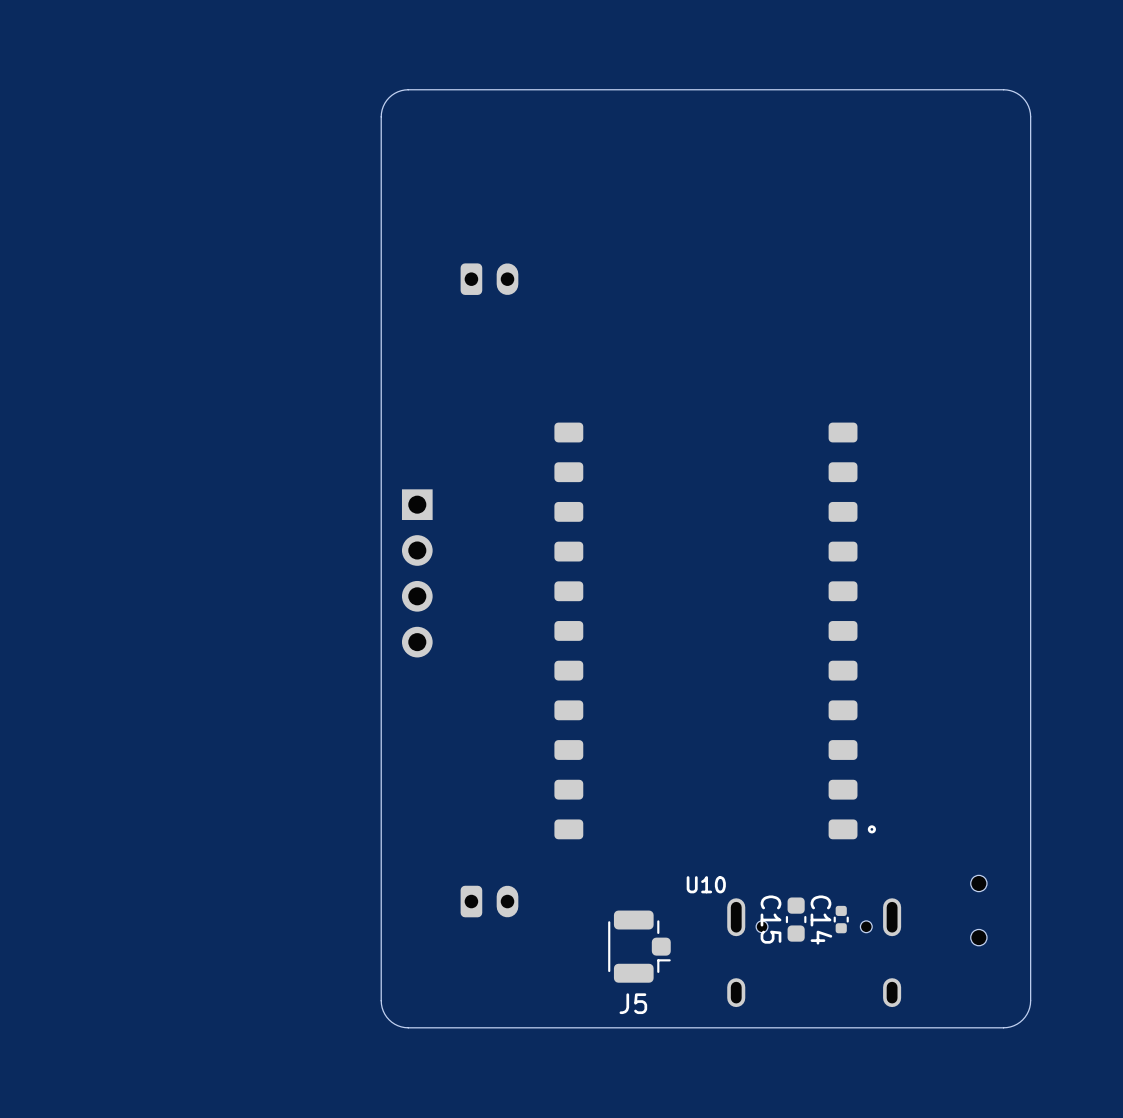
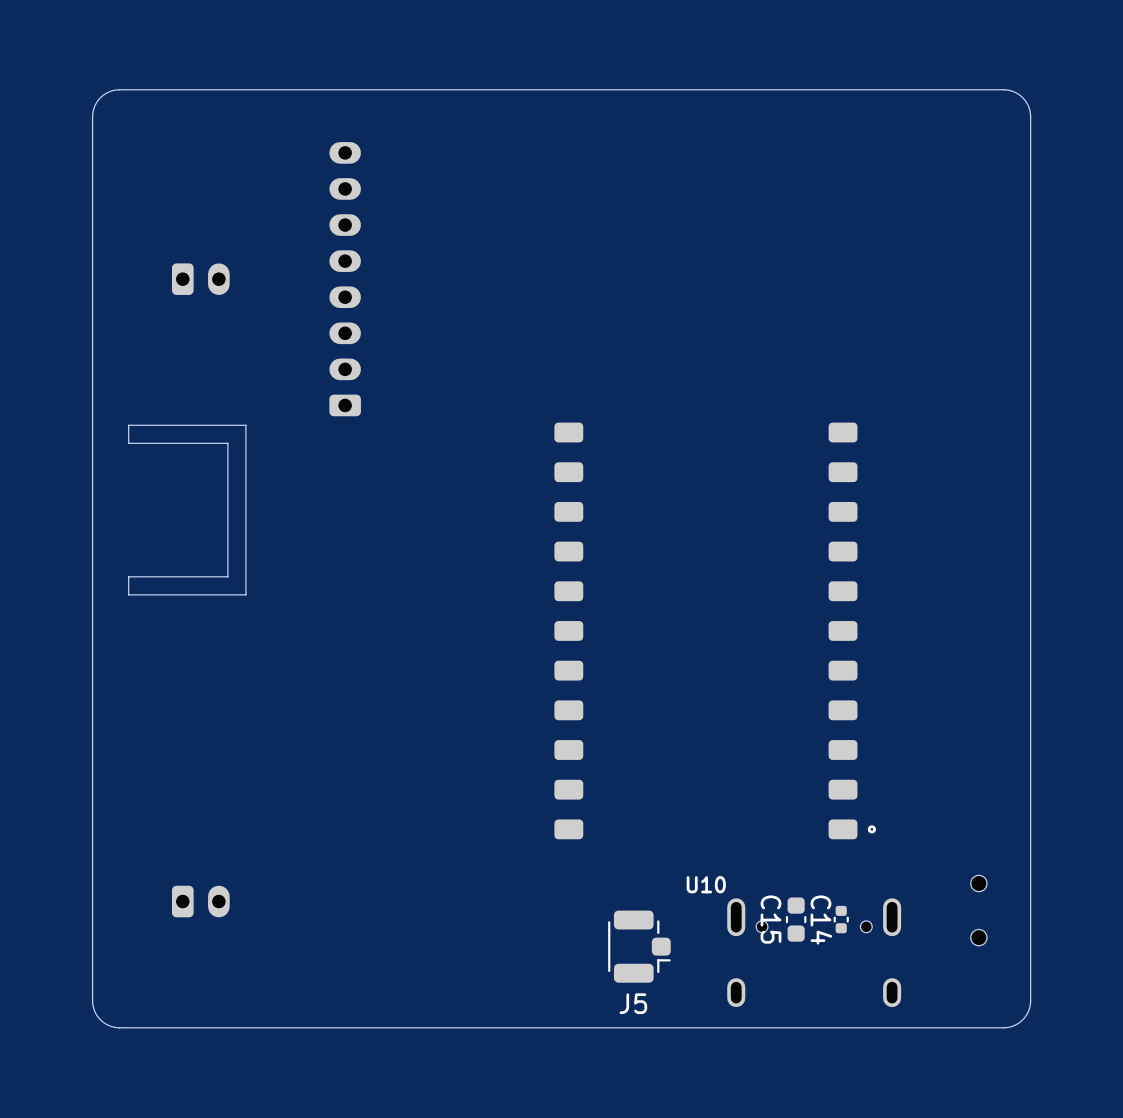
board edge: (408, 89) (397, 91) (389, 97) (383, 106) (381, 116) (381, 1000) (383, 1011) (389, 1019) (397, 1025) (408, 1027) -> (408, 89) (116, 89) (100, 97) (94, 106) (92, 116) (92, 1000) (94, 1011) (106, 1024) (119, 1027) (408, 1027)
part: none -> (345, 279)
part position: (489, 279) -> (200, 279)
board edge: none -> (245, 425) (128, 425) (128, 443) (227, 443) (227, 576) (128, 576) (128, 594) (245, 594) (245, 425)
part: (417, 573) -> none
part position: (489, 901) -> (200, 901)

